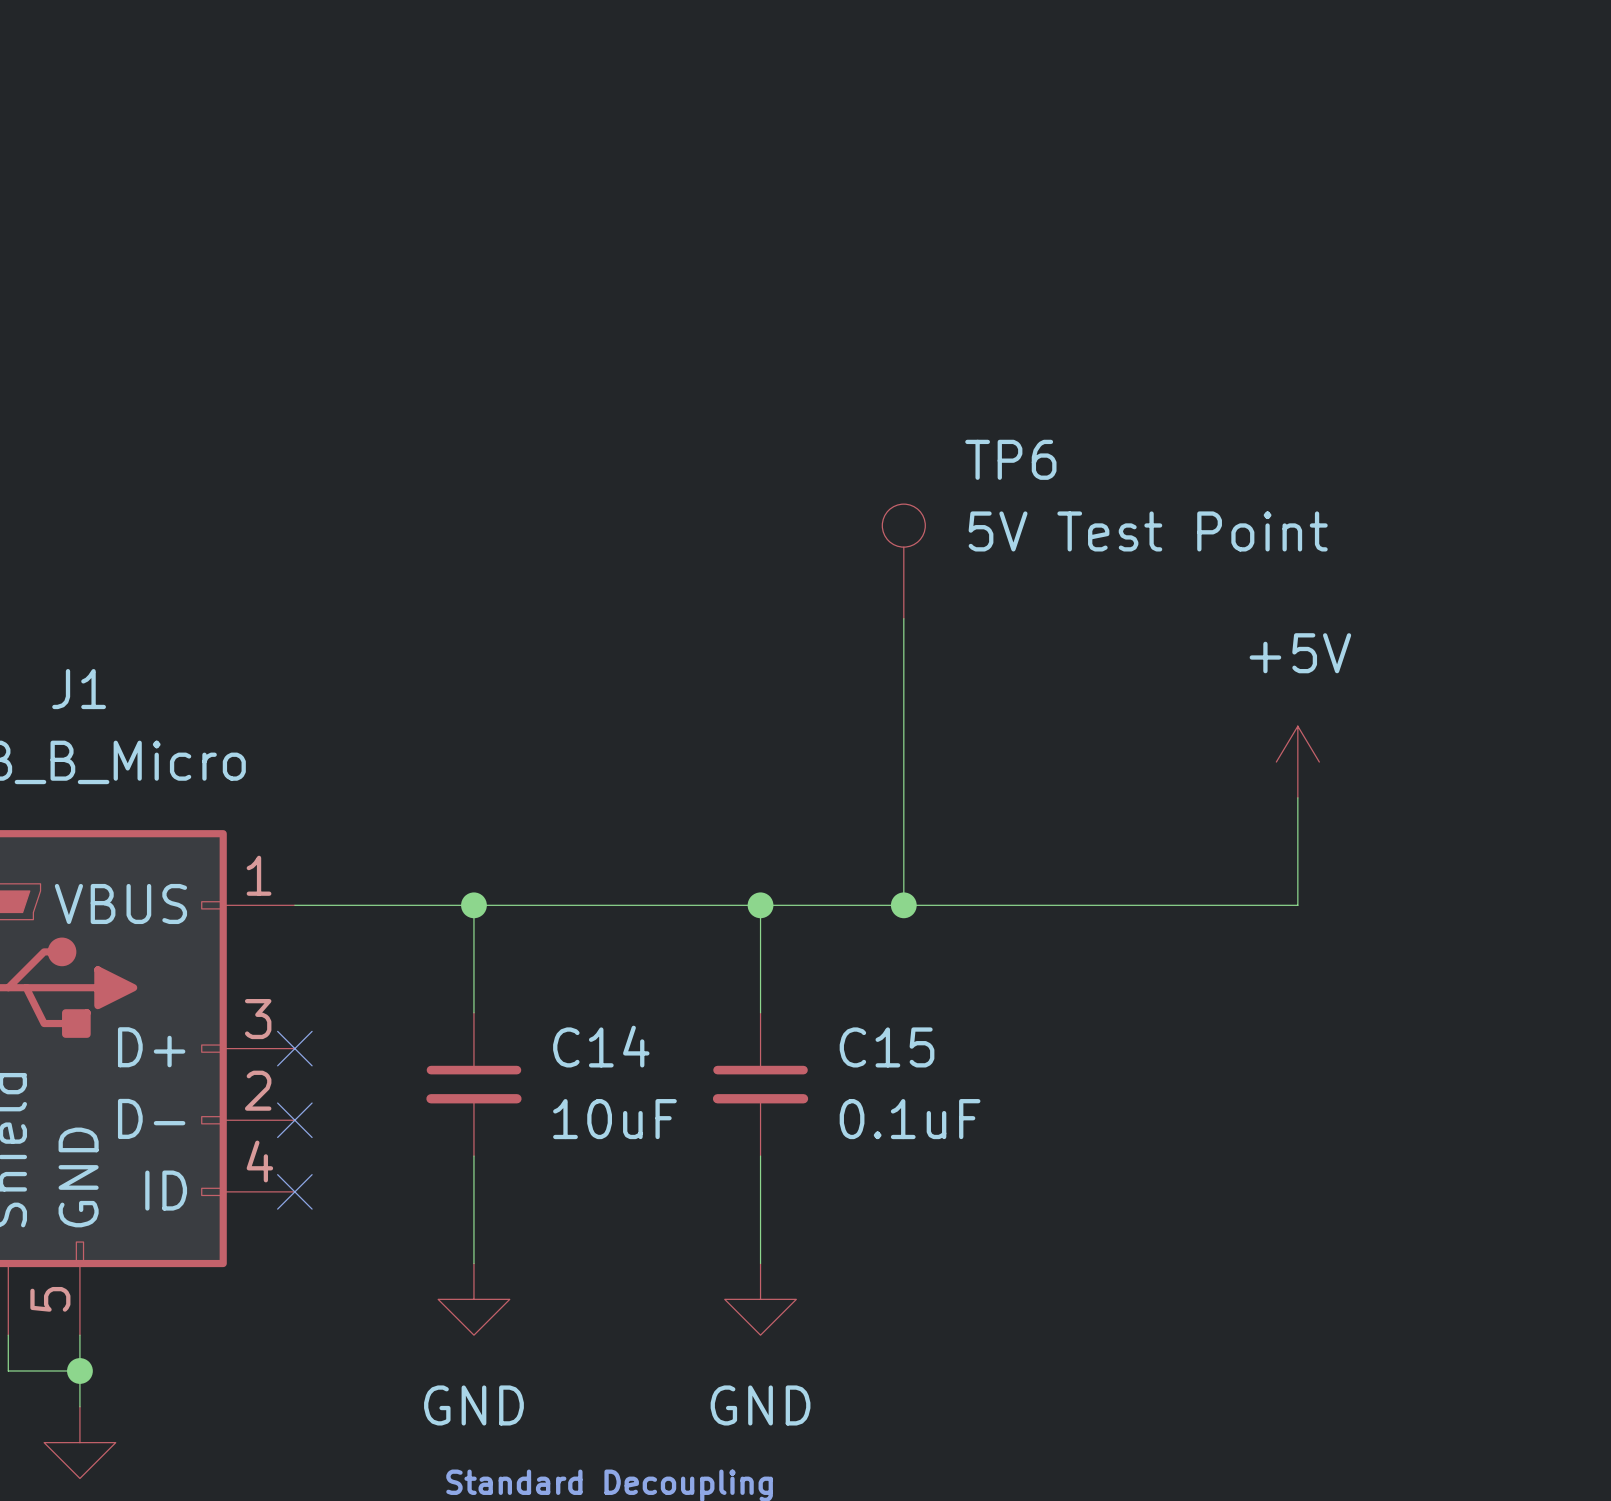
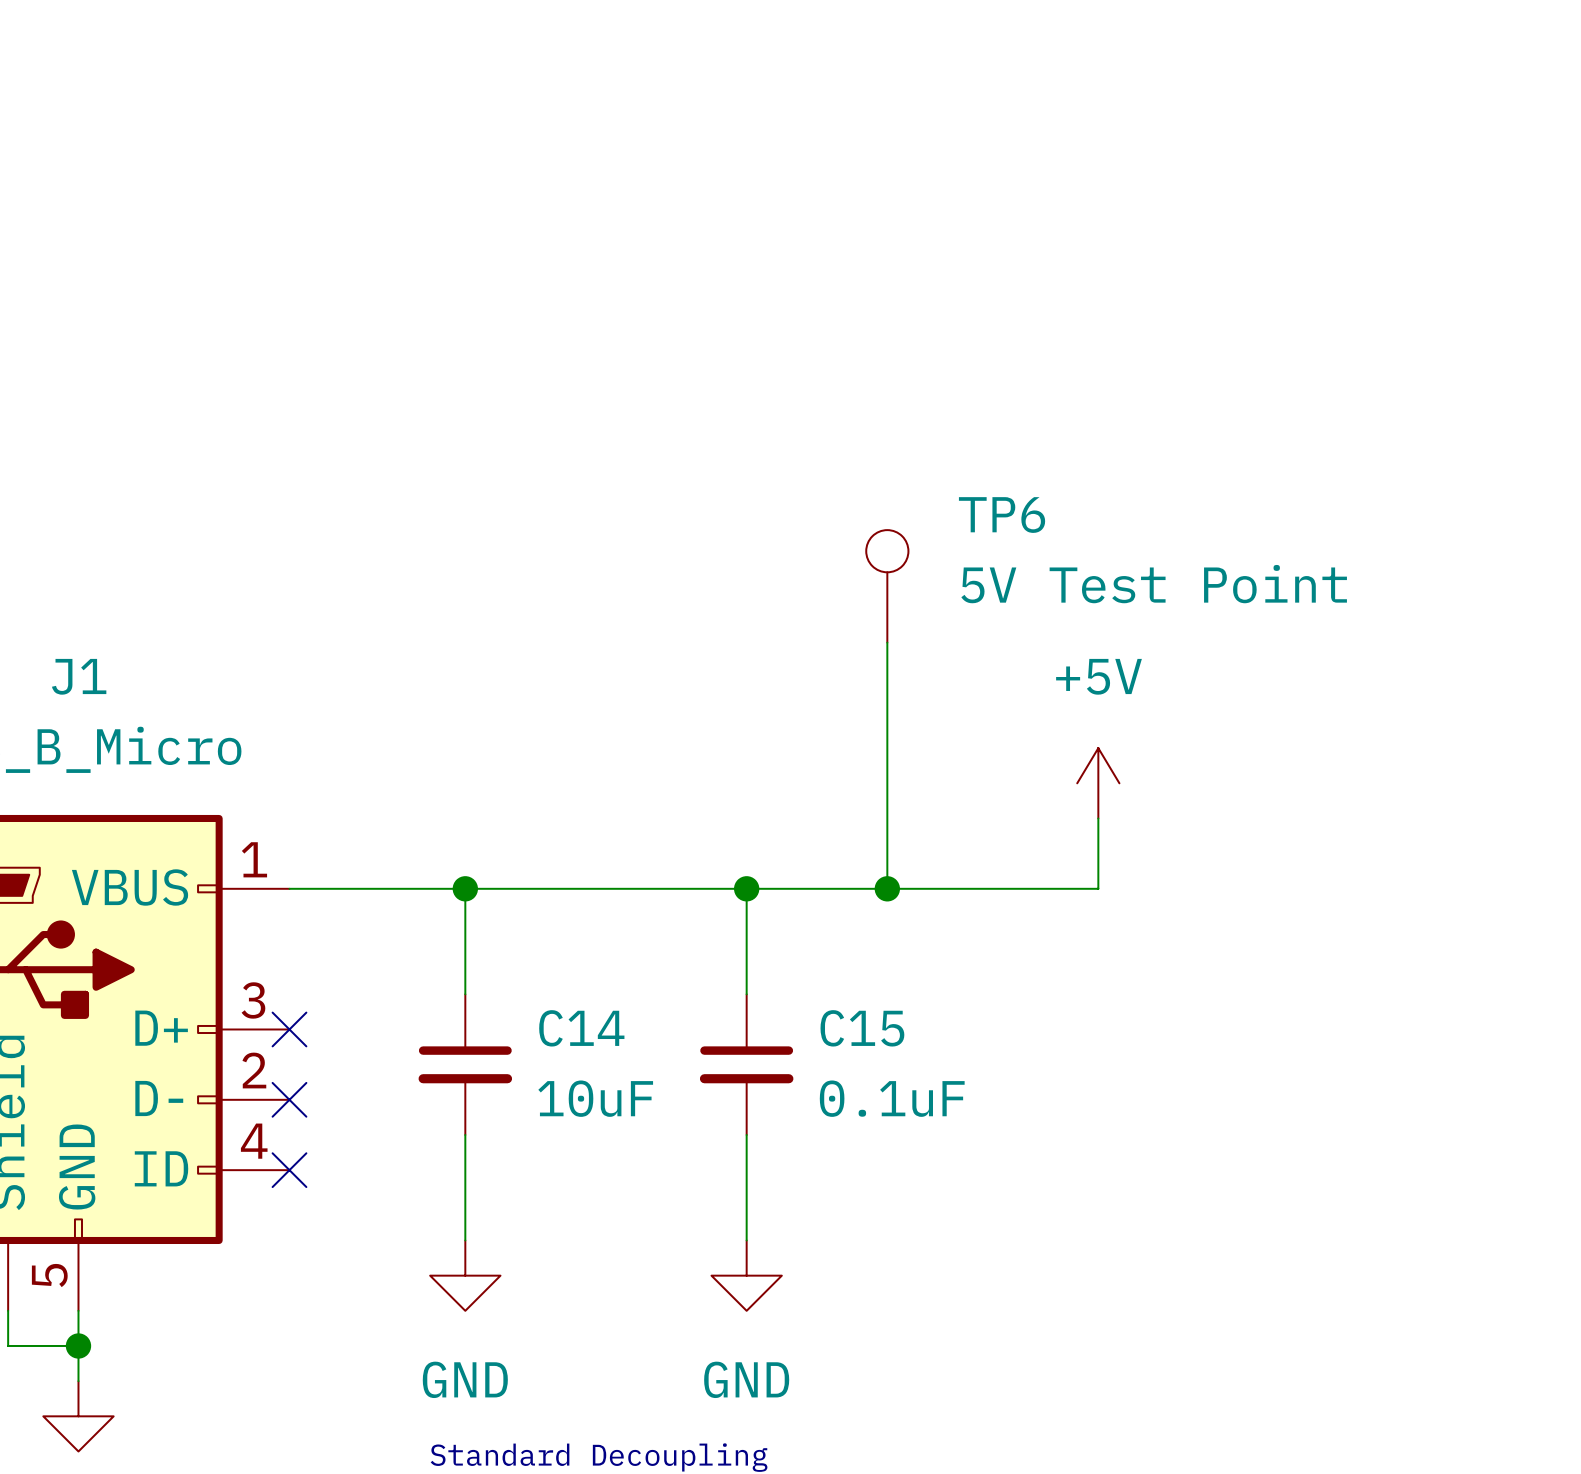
TP6 name position: TP6 (1010, 459) -> TP6 (1002, 515)
TP6 value position: 5V Test Point (1148, 531) -> 5V Test Point (1154, 584)
TP6 position: (903, 561) -> (887, 586)
power symbol position: +5V (1297, 762) -> +5V (1098, 783)
wire: (1297, 797) (1297, 905) (1118, 905) -> (1098, 818) (1098, 888)

